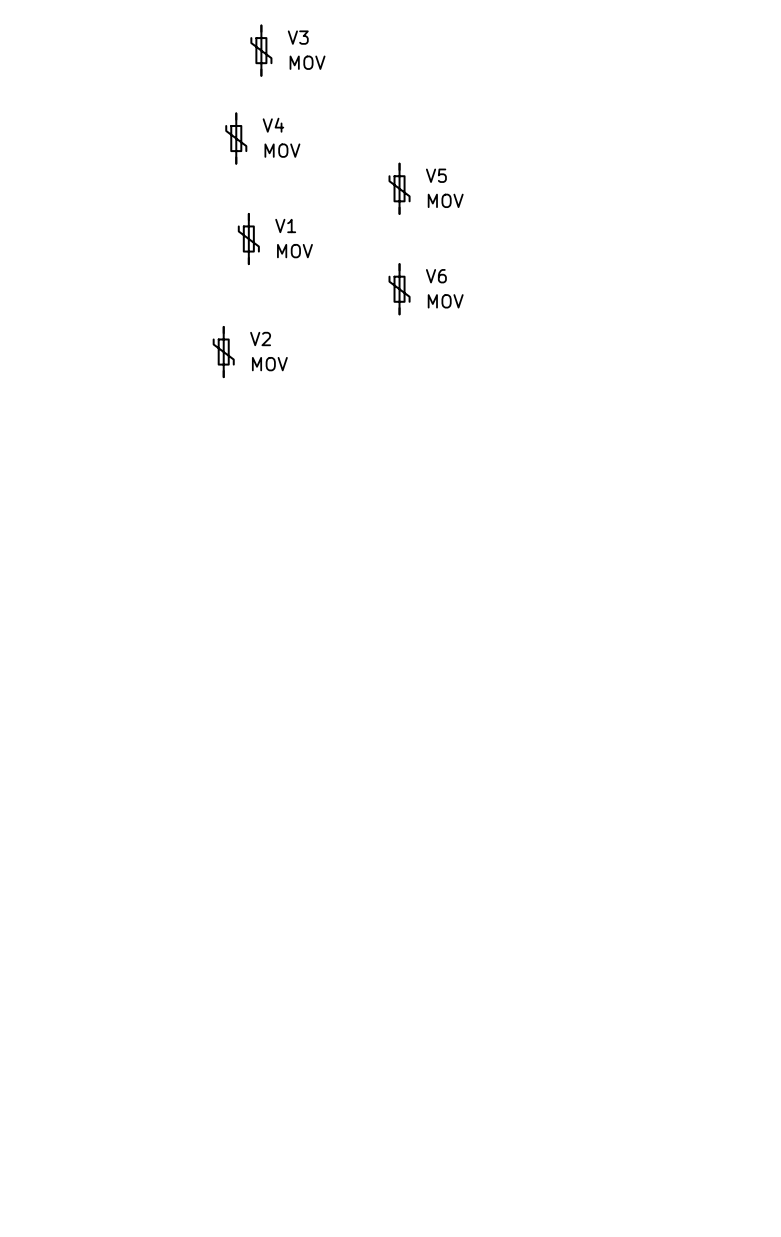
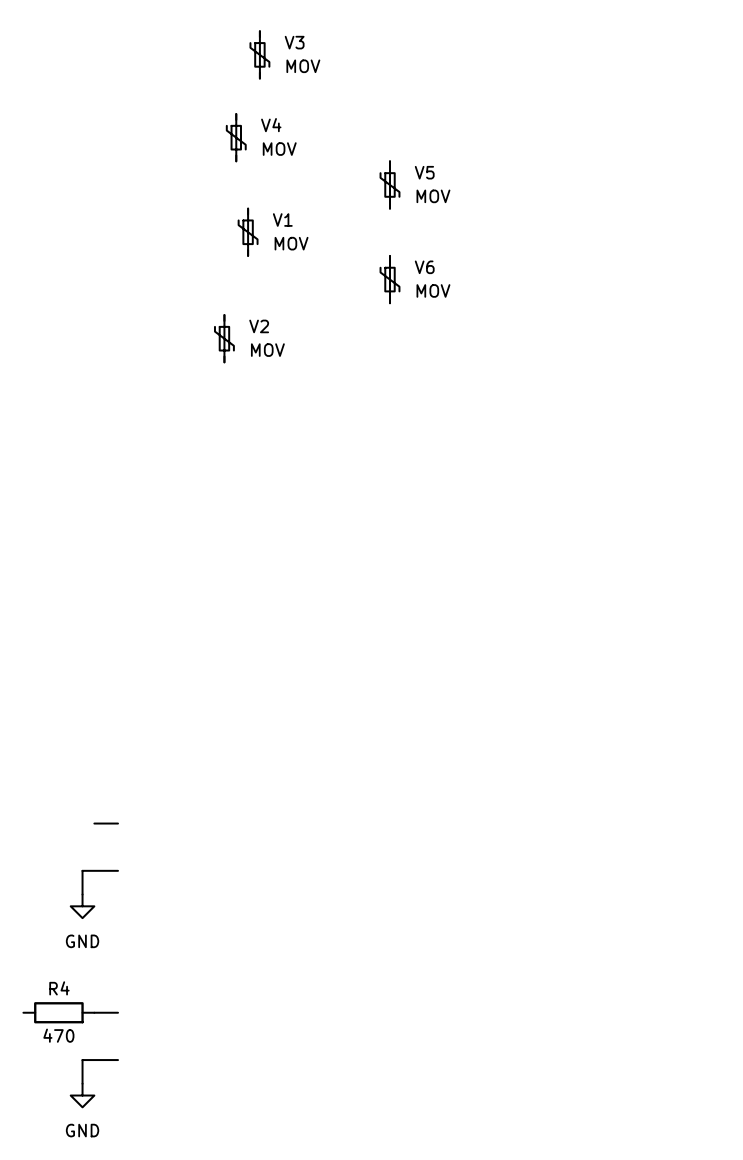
wire: none -> (94, 823) (118, 823)
wire: none -> (118, 870) (82, 870) (82, 894)
power symbol: none -> GND (82, 906)
R4: none -> 470 (58, 1012)
wire: none -> (94, 1012) (118, 1012)
wire: none -> (118, 1060) (82, 1060) (82, 1083)
power symbol: none -> GND (82, 1095)

